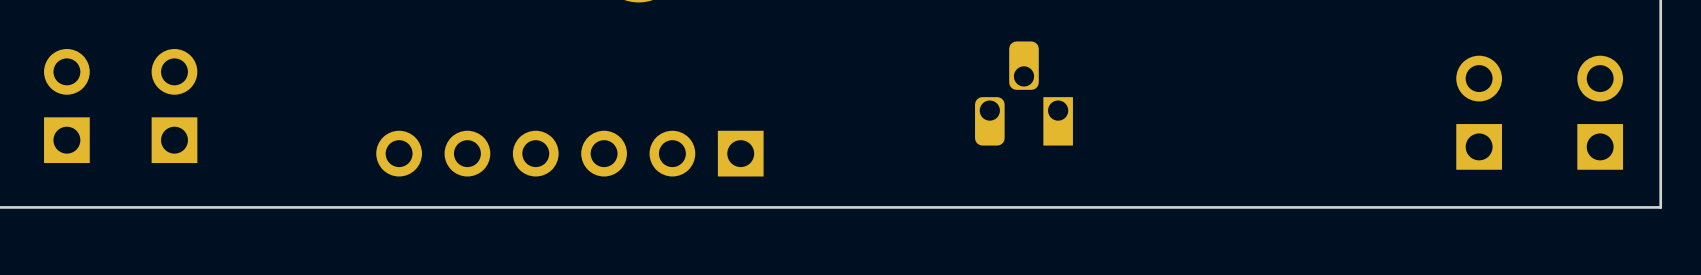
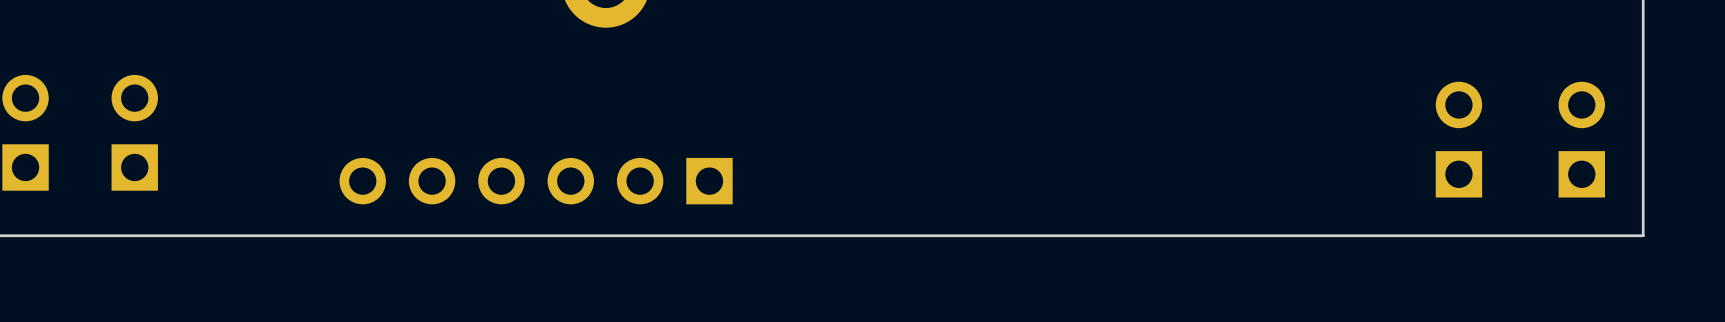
part: (1023, 93) -> none

